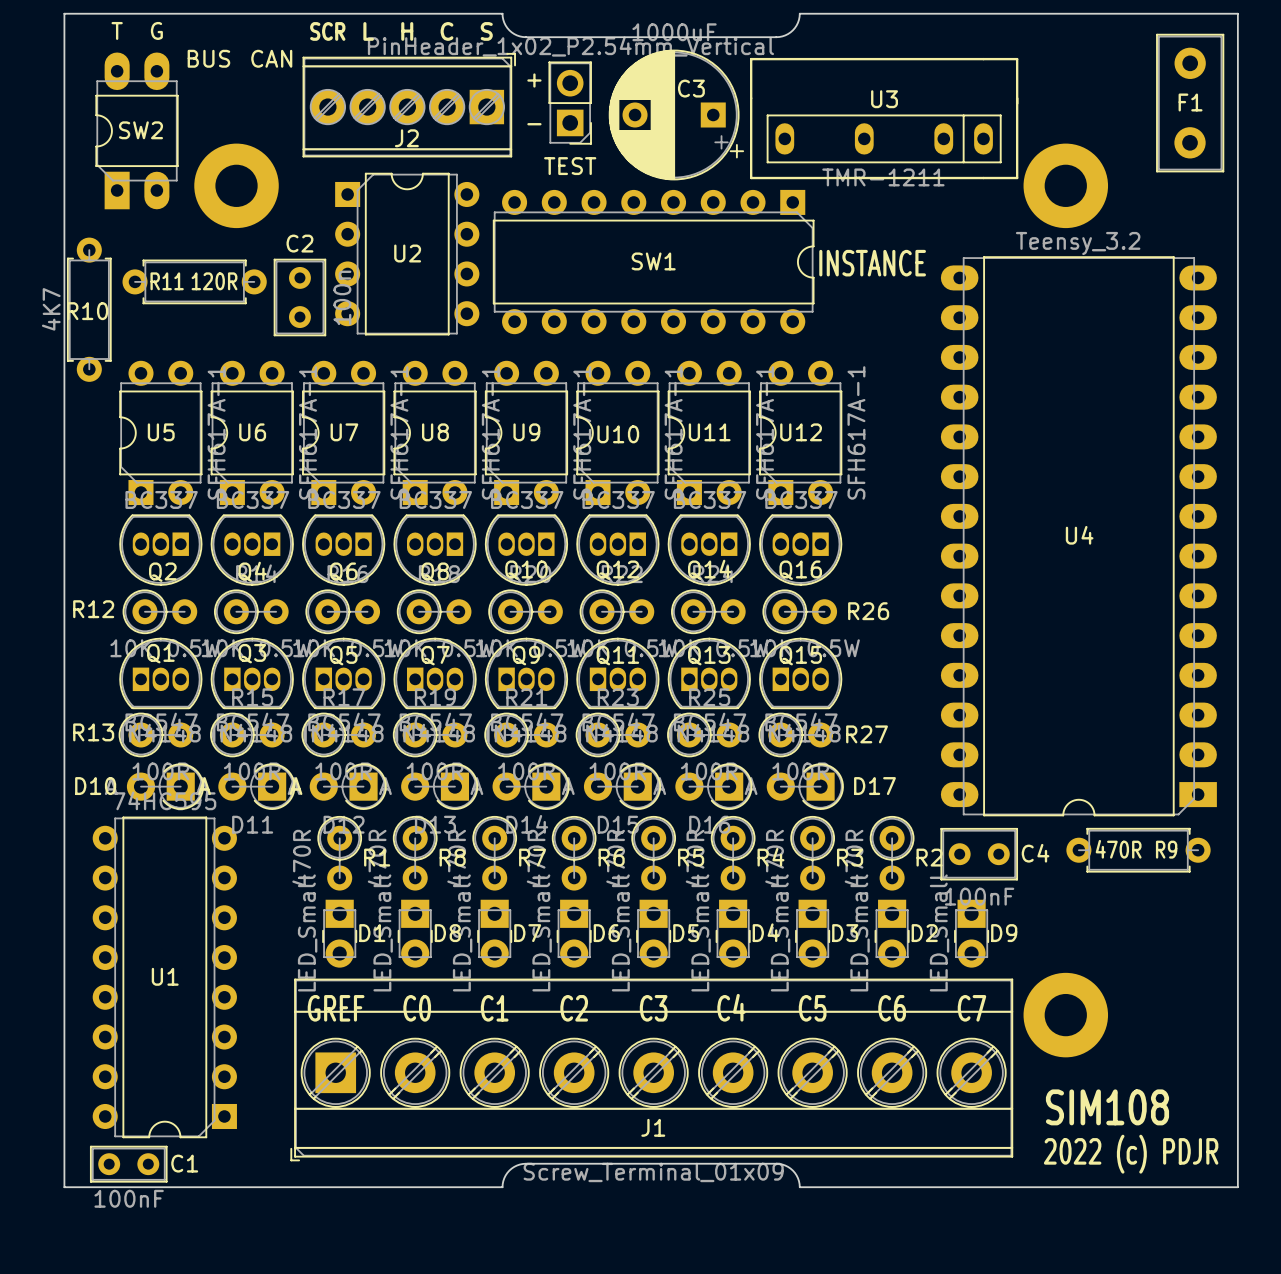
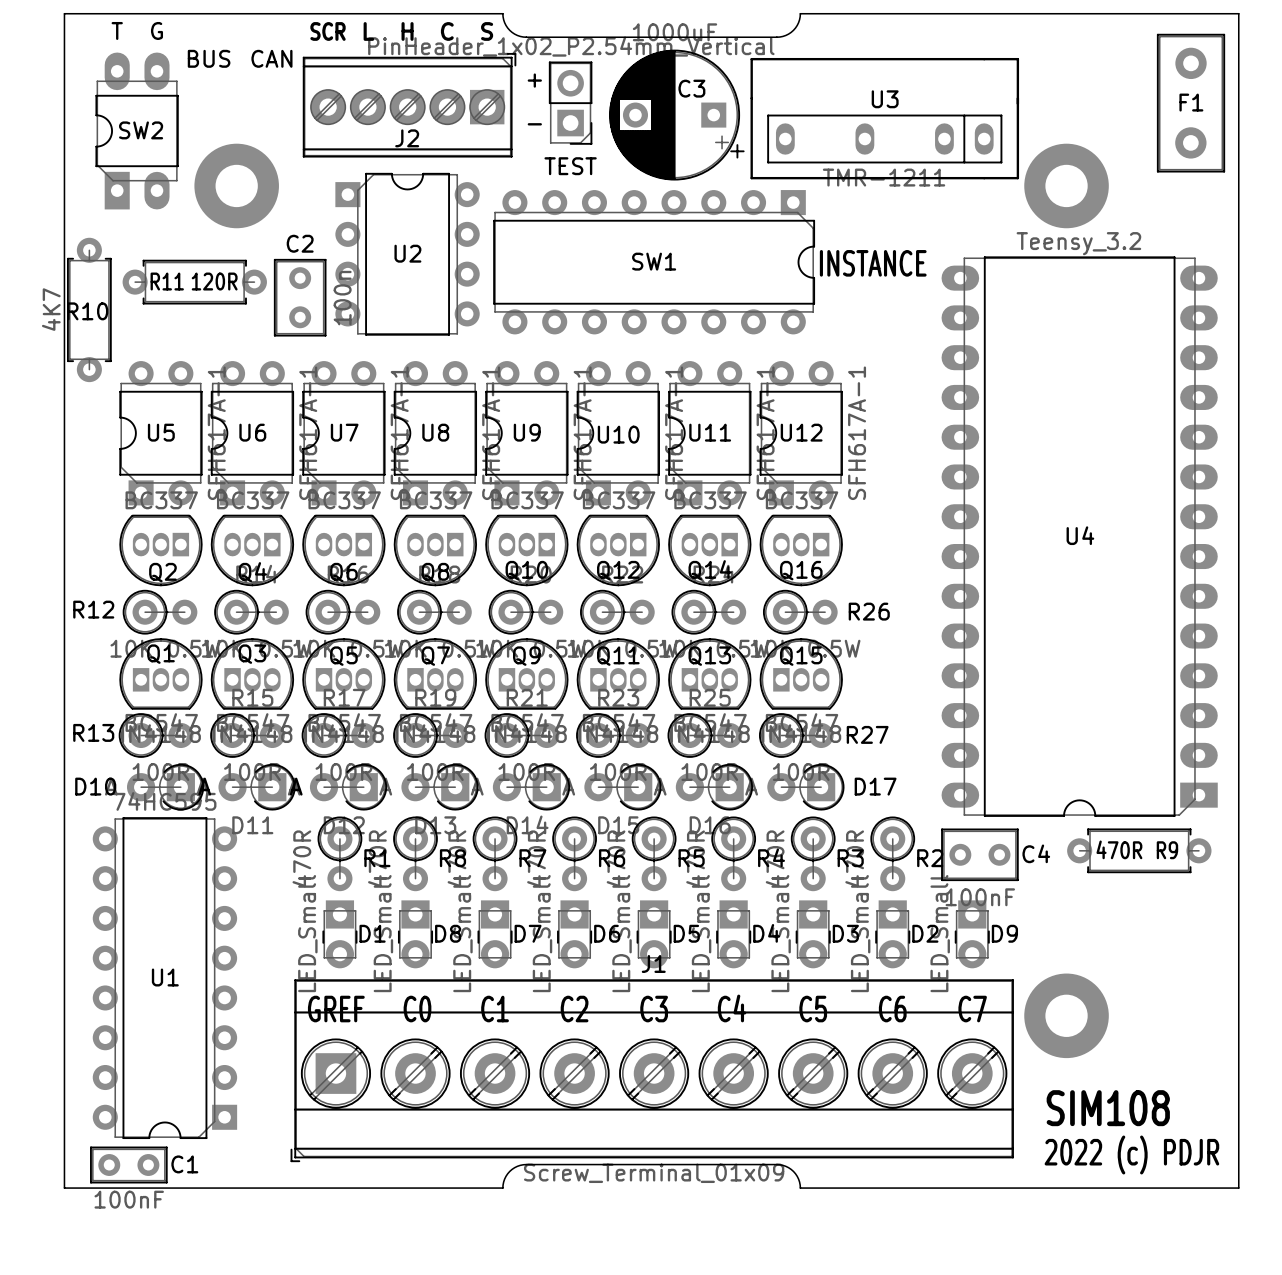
J1 name position: J1 (653, 1127) -> J1 (653, 963)

